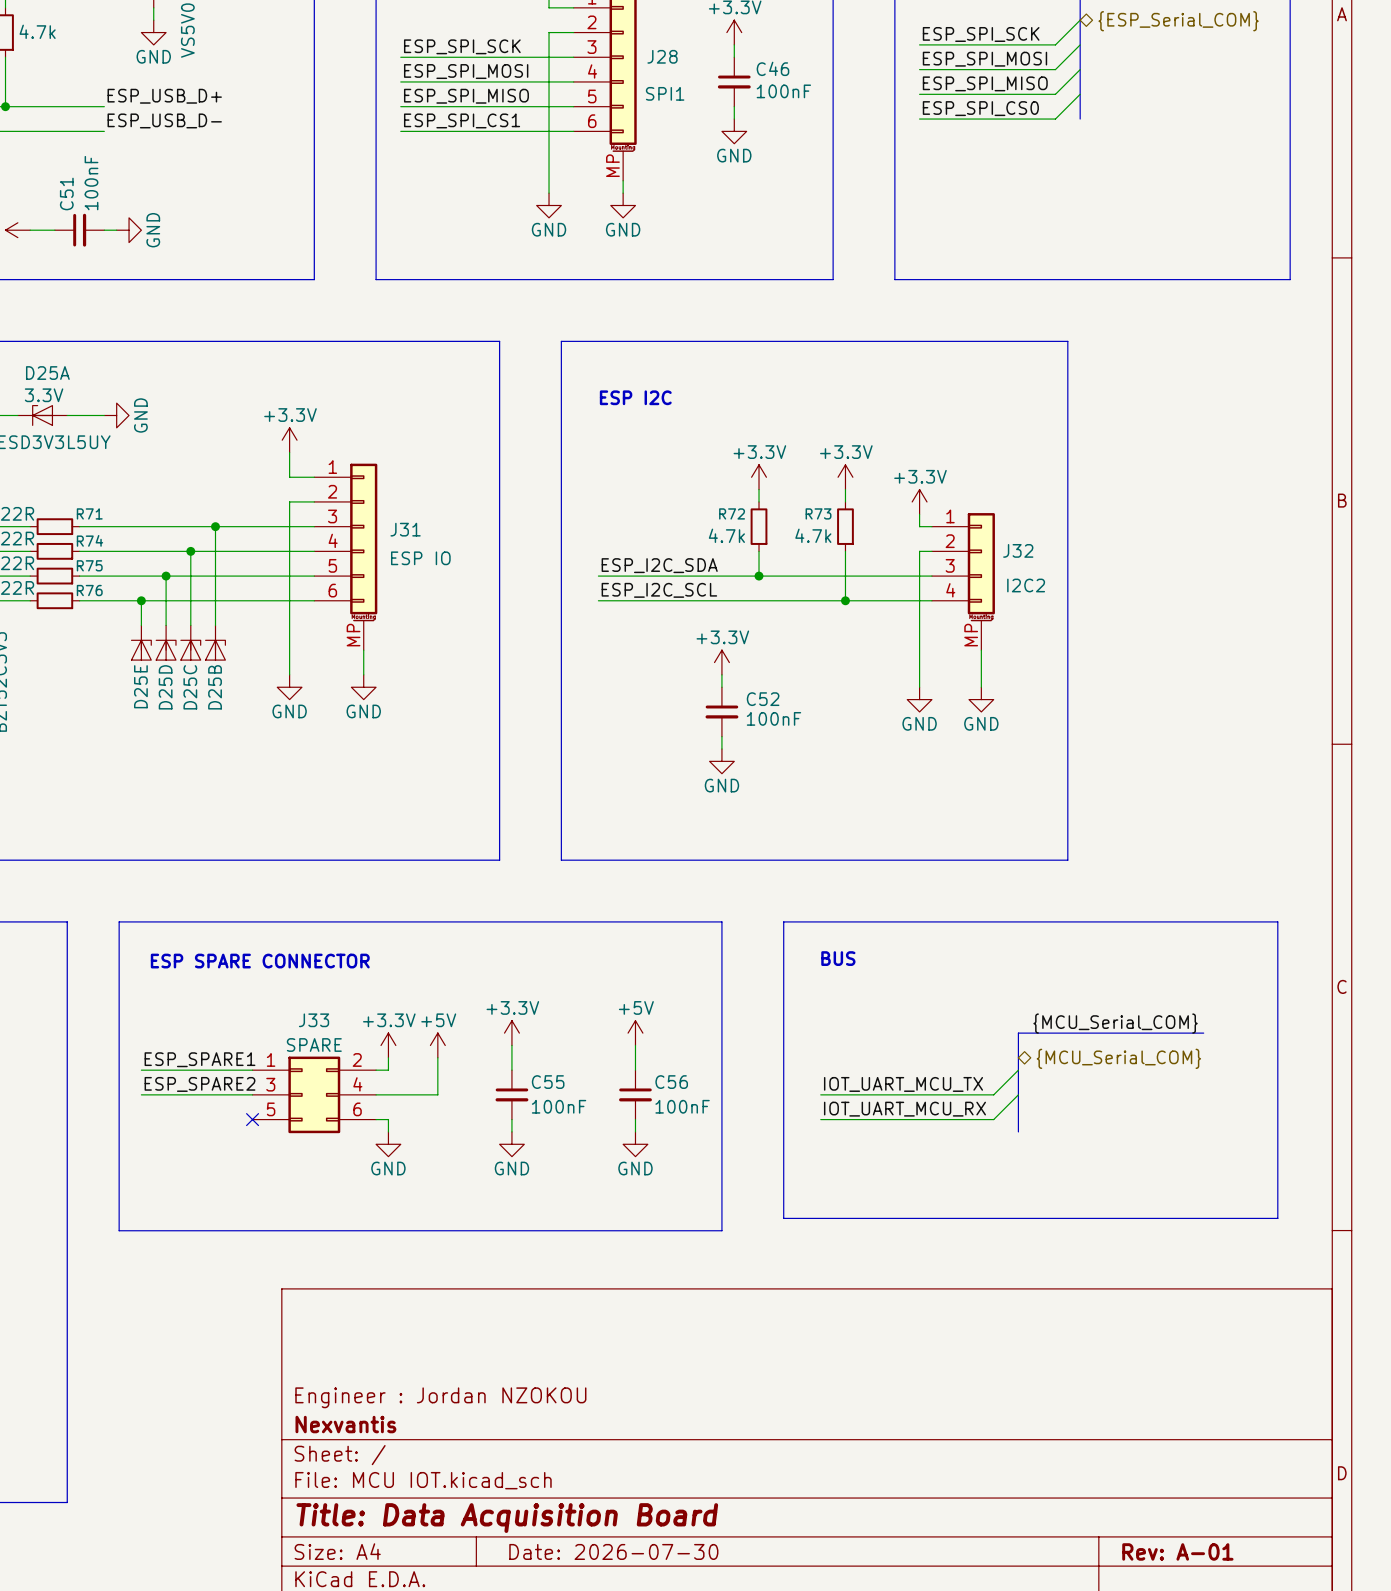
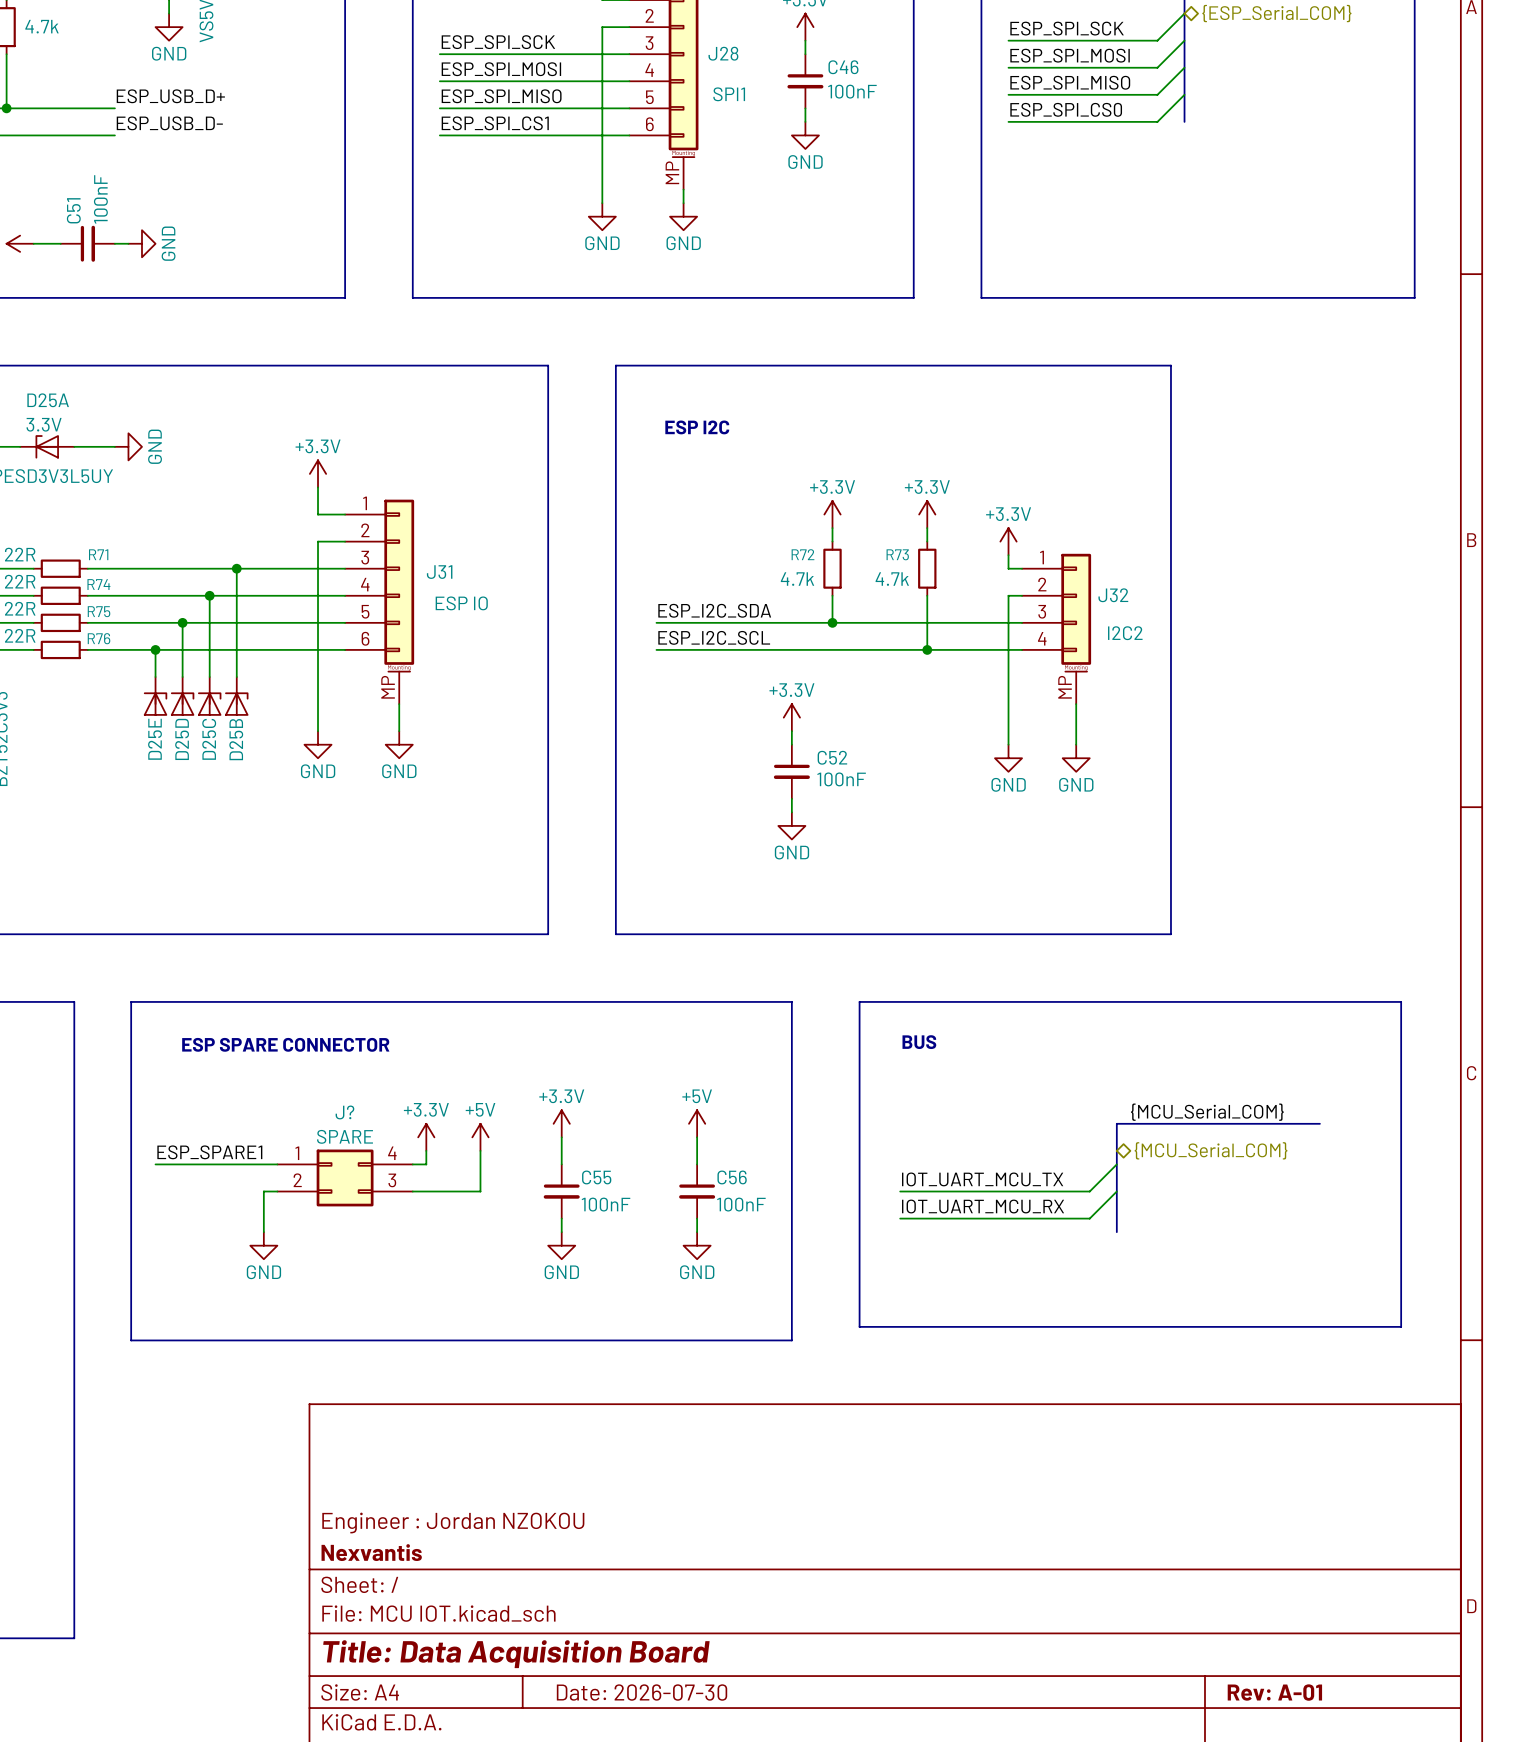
J?: none -> (345, 1177)
label: ESP_SPARE2 (200, 1084) -> none
wire: (141, 1094) (240, 1094) -> (263, 1232) (263, 1191)
J33: (314, 1094) -> none
no-connect mark: (252, 1119) -> none
wire: (376, 1119) (388, 1119) (388, 1131) -> none
power symbol position: GND (388, 1144) -> GND (263, 1245)

